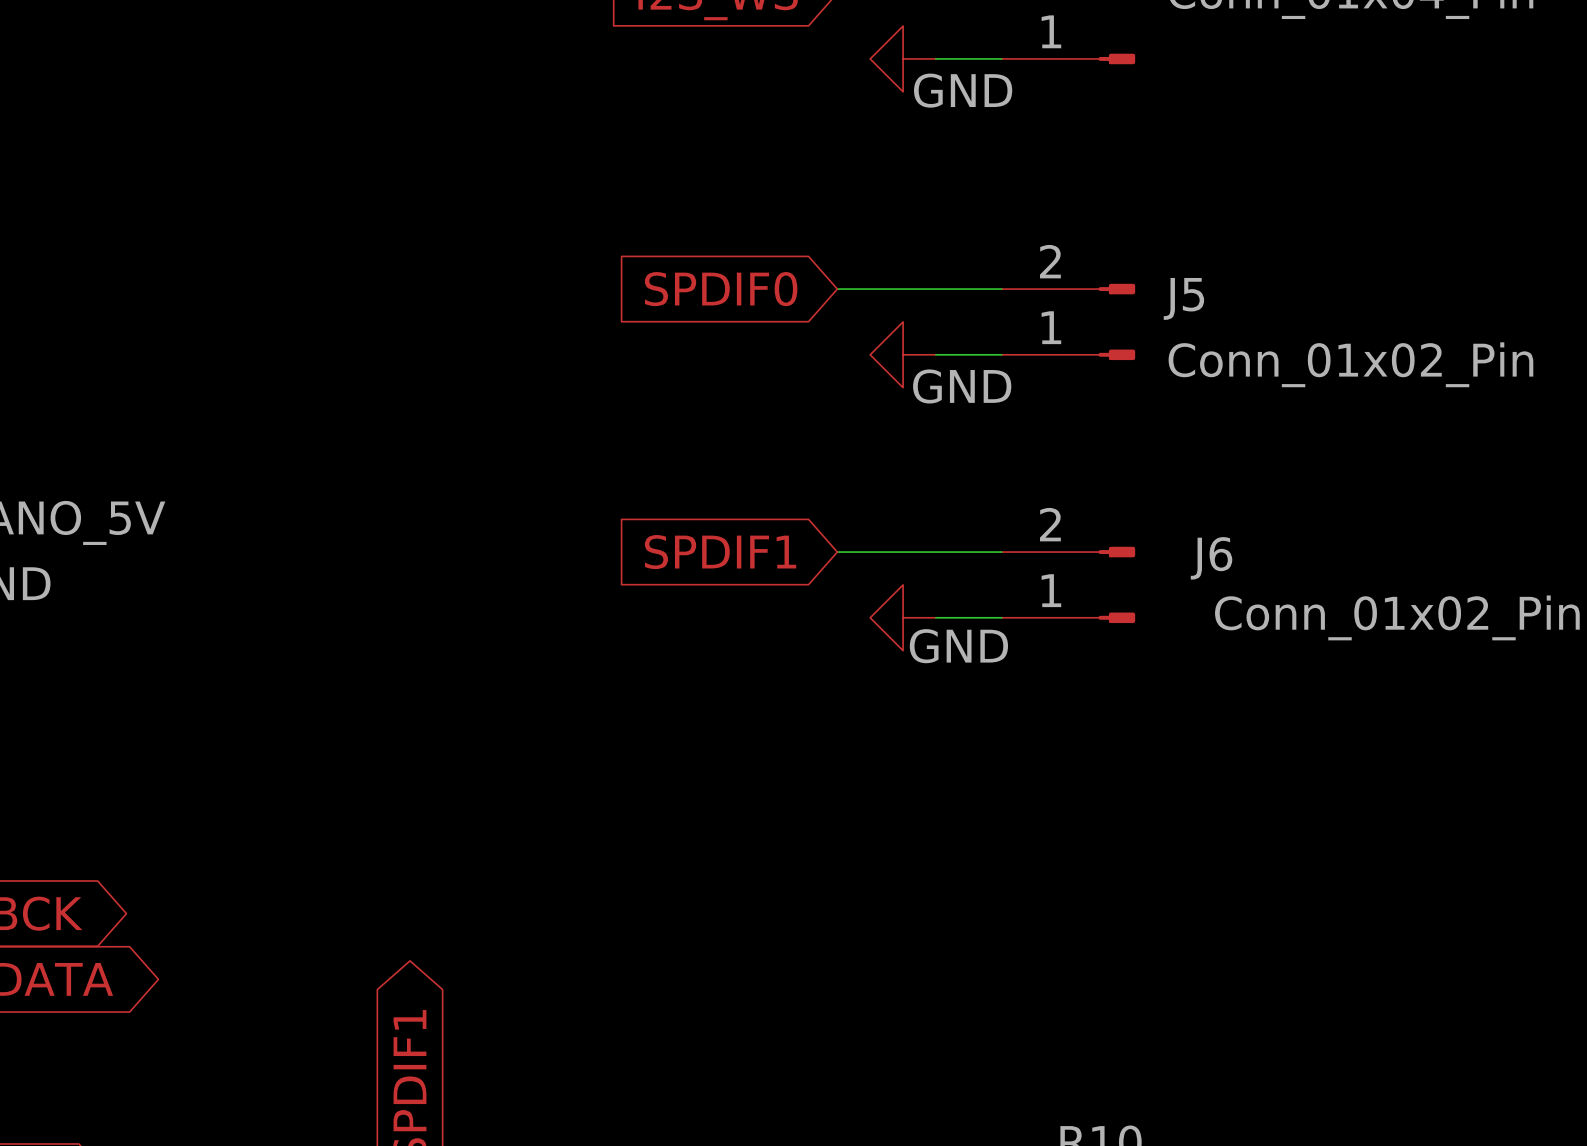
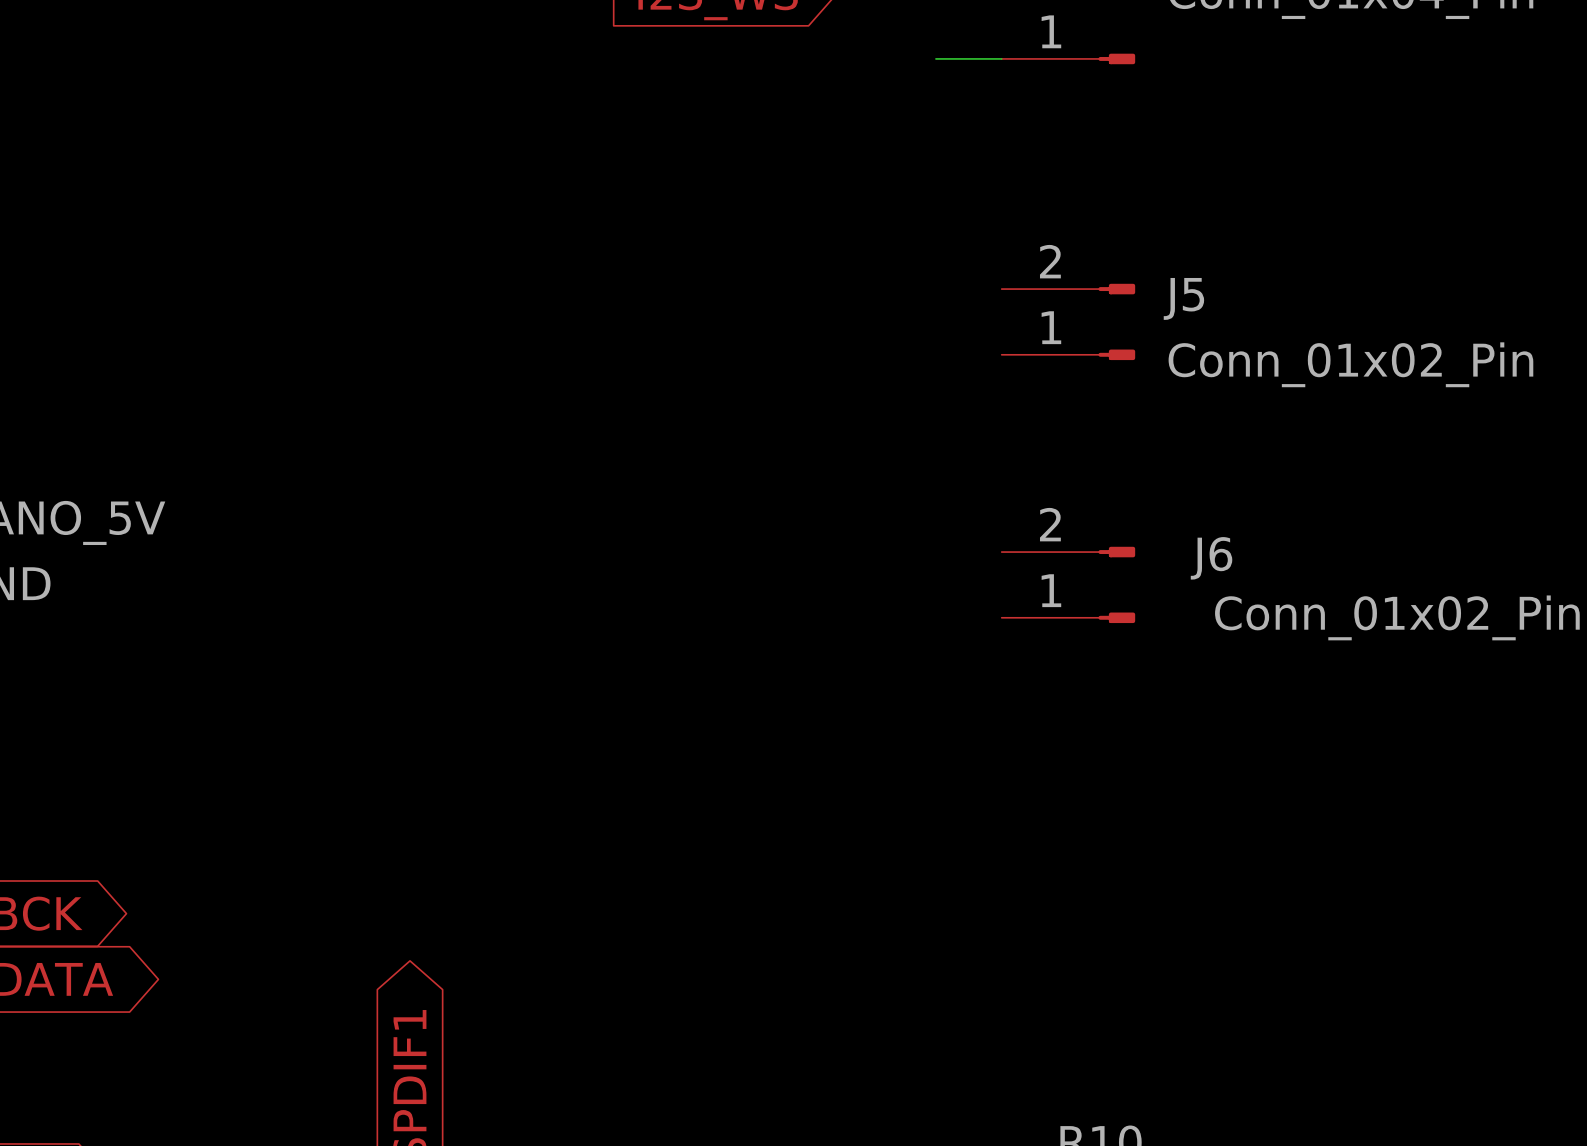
power symbol: GND (903, 58) -> none
global label: SPDIF0 (721, 289) -> none
wire: (837, 289) (1001, 289) -> none
power symbol: GND (903, 354) -> none
wire: (935, 354) (1001, 354) -> none
global label: SPDIF1 (720, 552) -> none
wire: (837, 552) (1001, 552) -> none
power symbol: GND (903, 617) -> none
wire: (935, 617) (1001, 617) -> none

